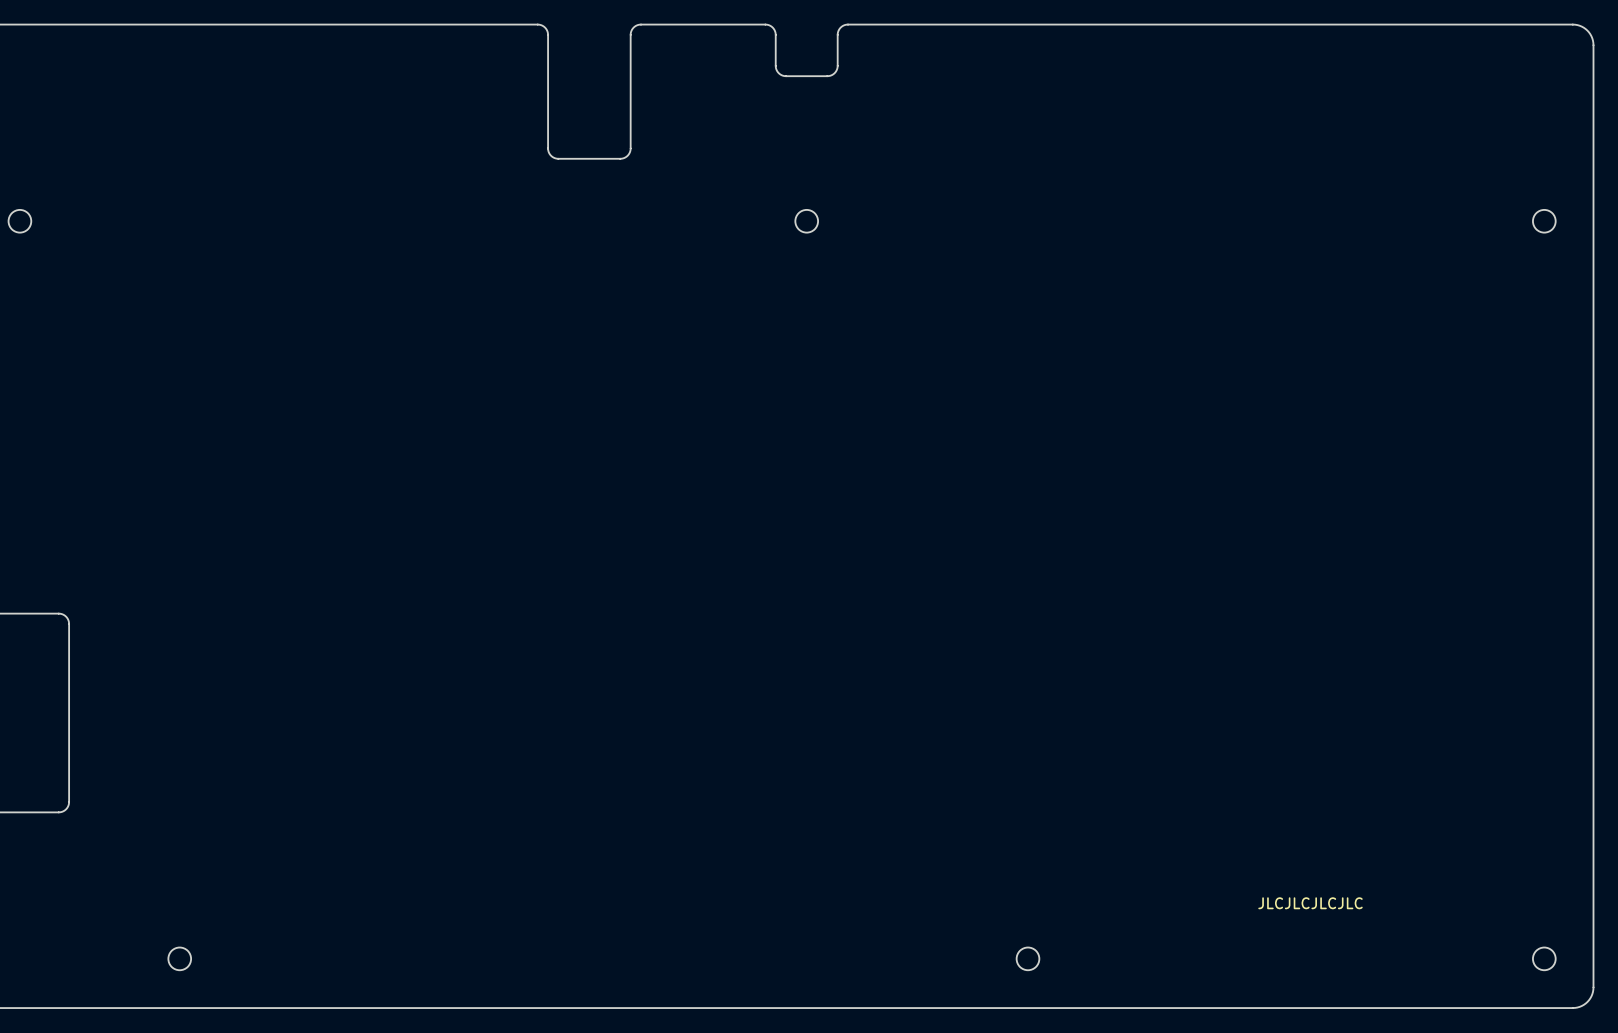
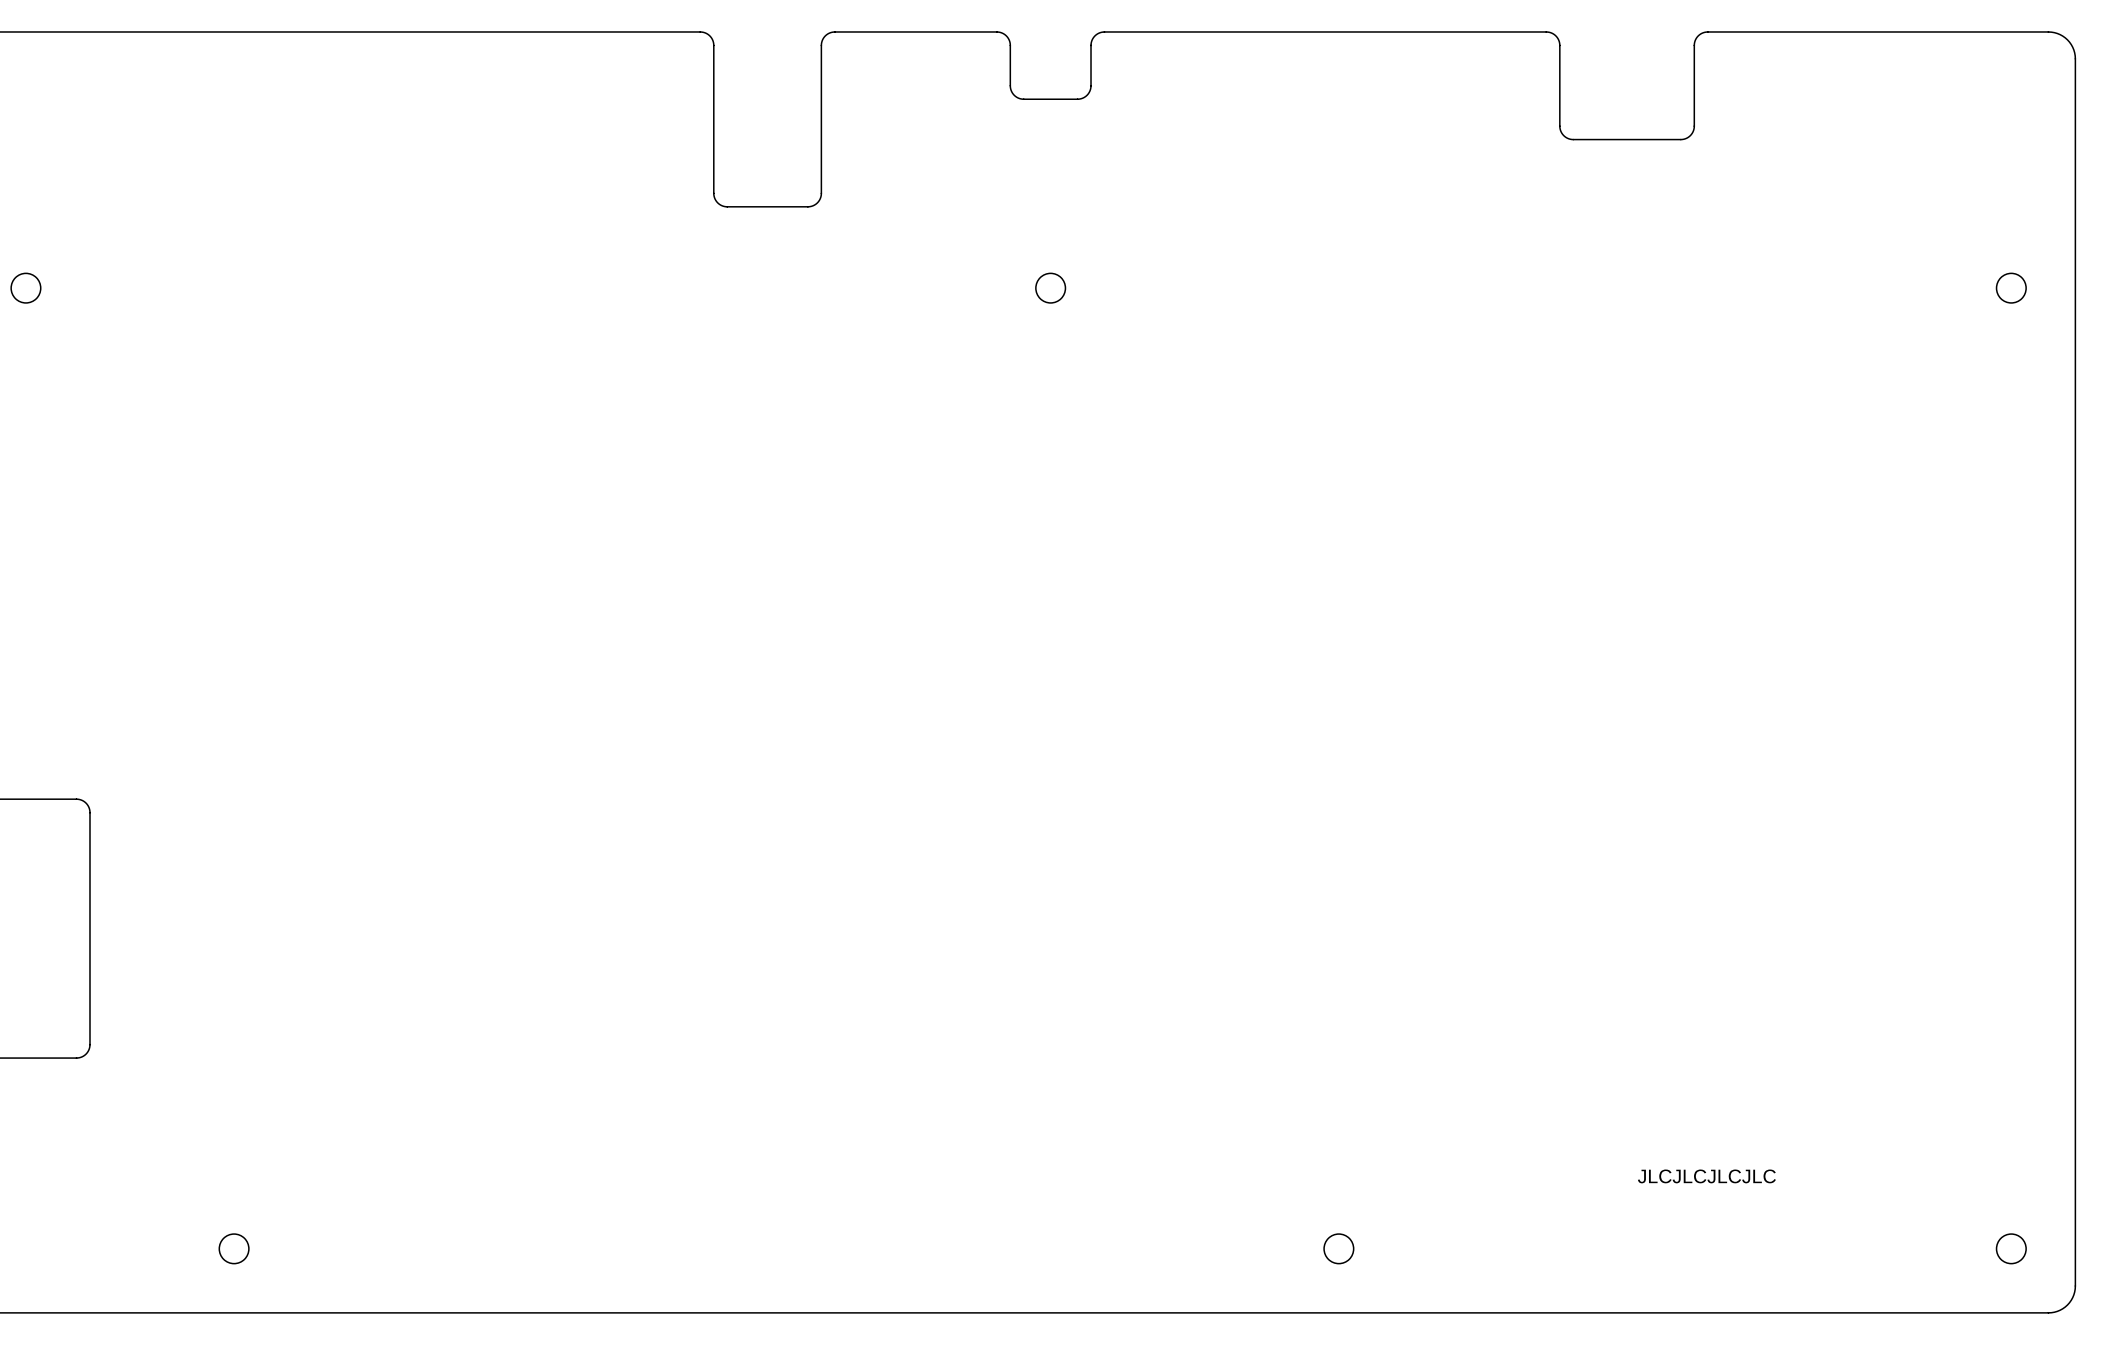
board edge: (1187, 24) (1311, 24) -> (1546, 31) (1554, 34) (1559, 42) (1559, 127) (1564, 136) (1573, 139) (1680, 139) (1689, 136) (1694, 127) (1694, 42) (1699, 34) (1707, 31)

